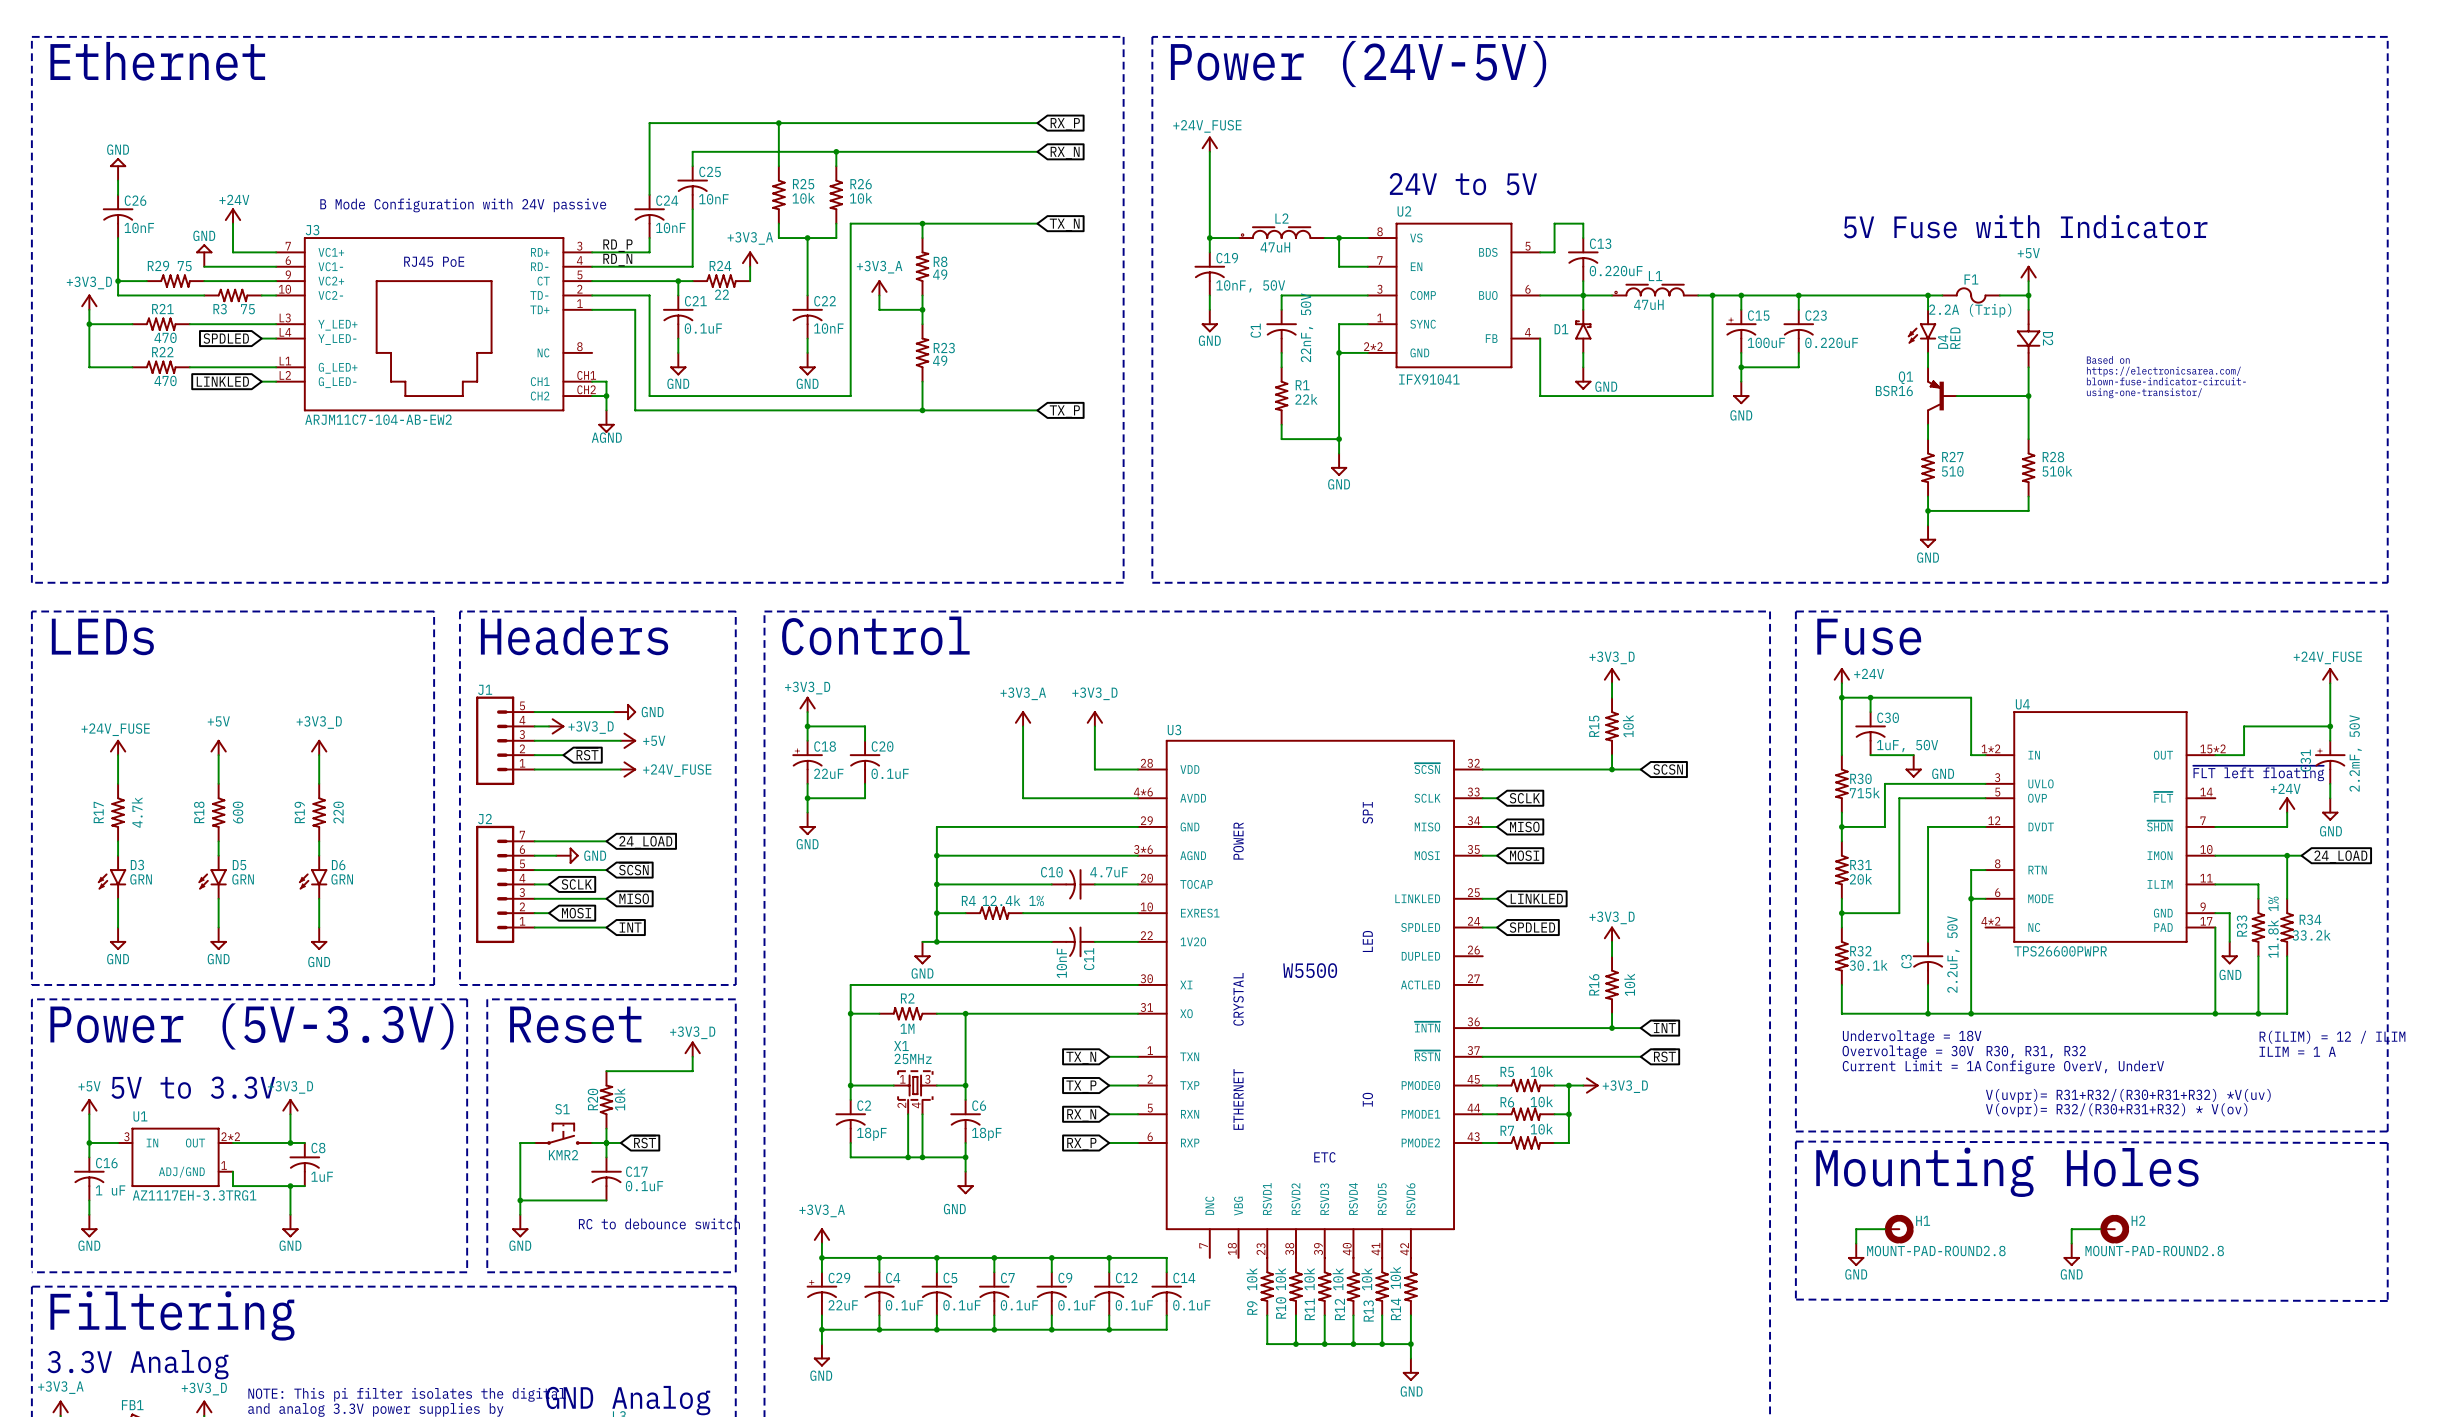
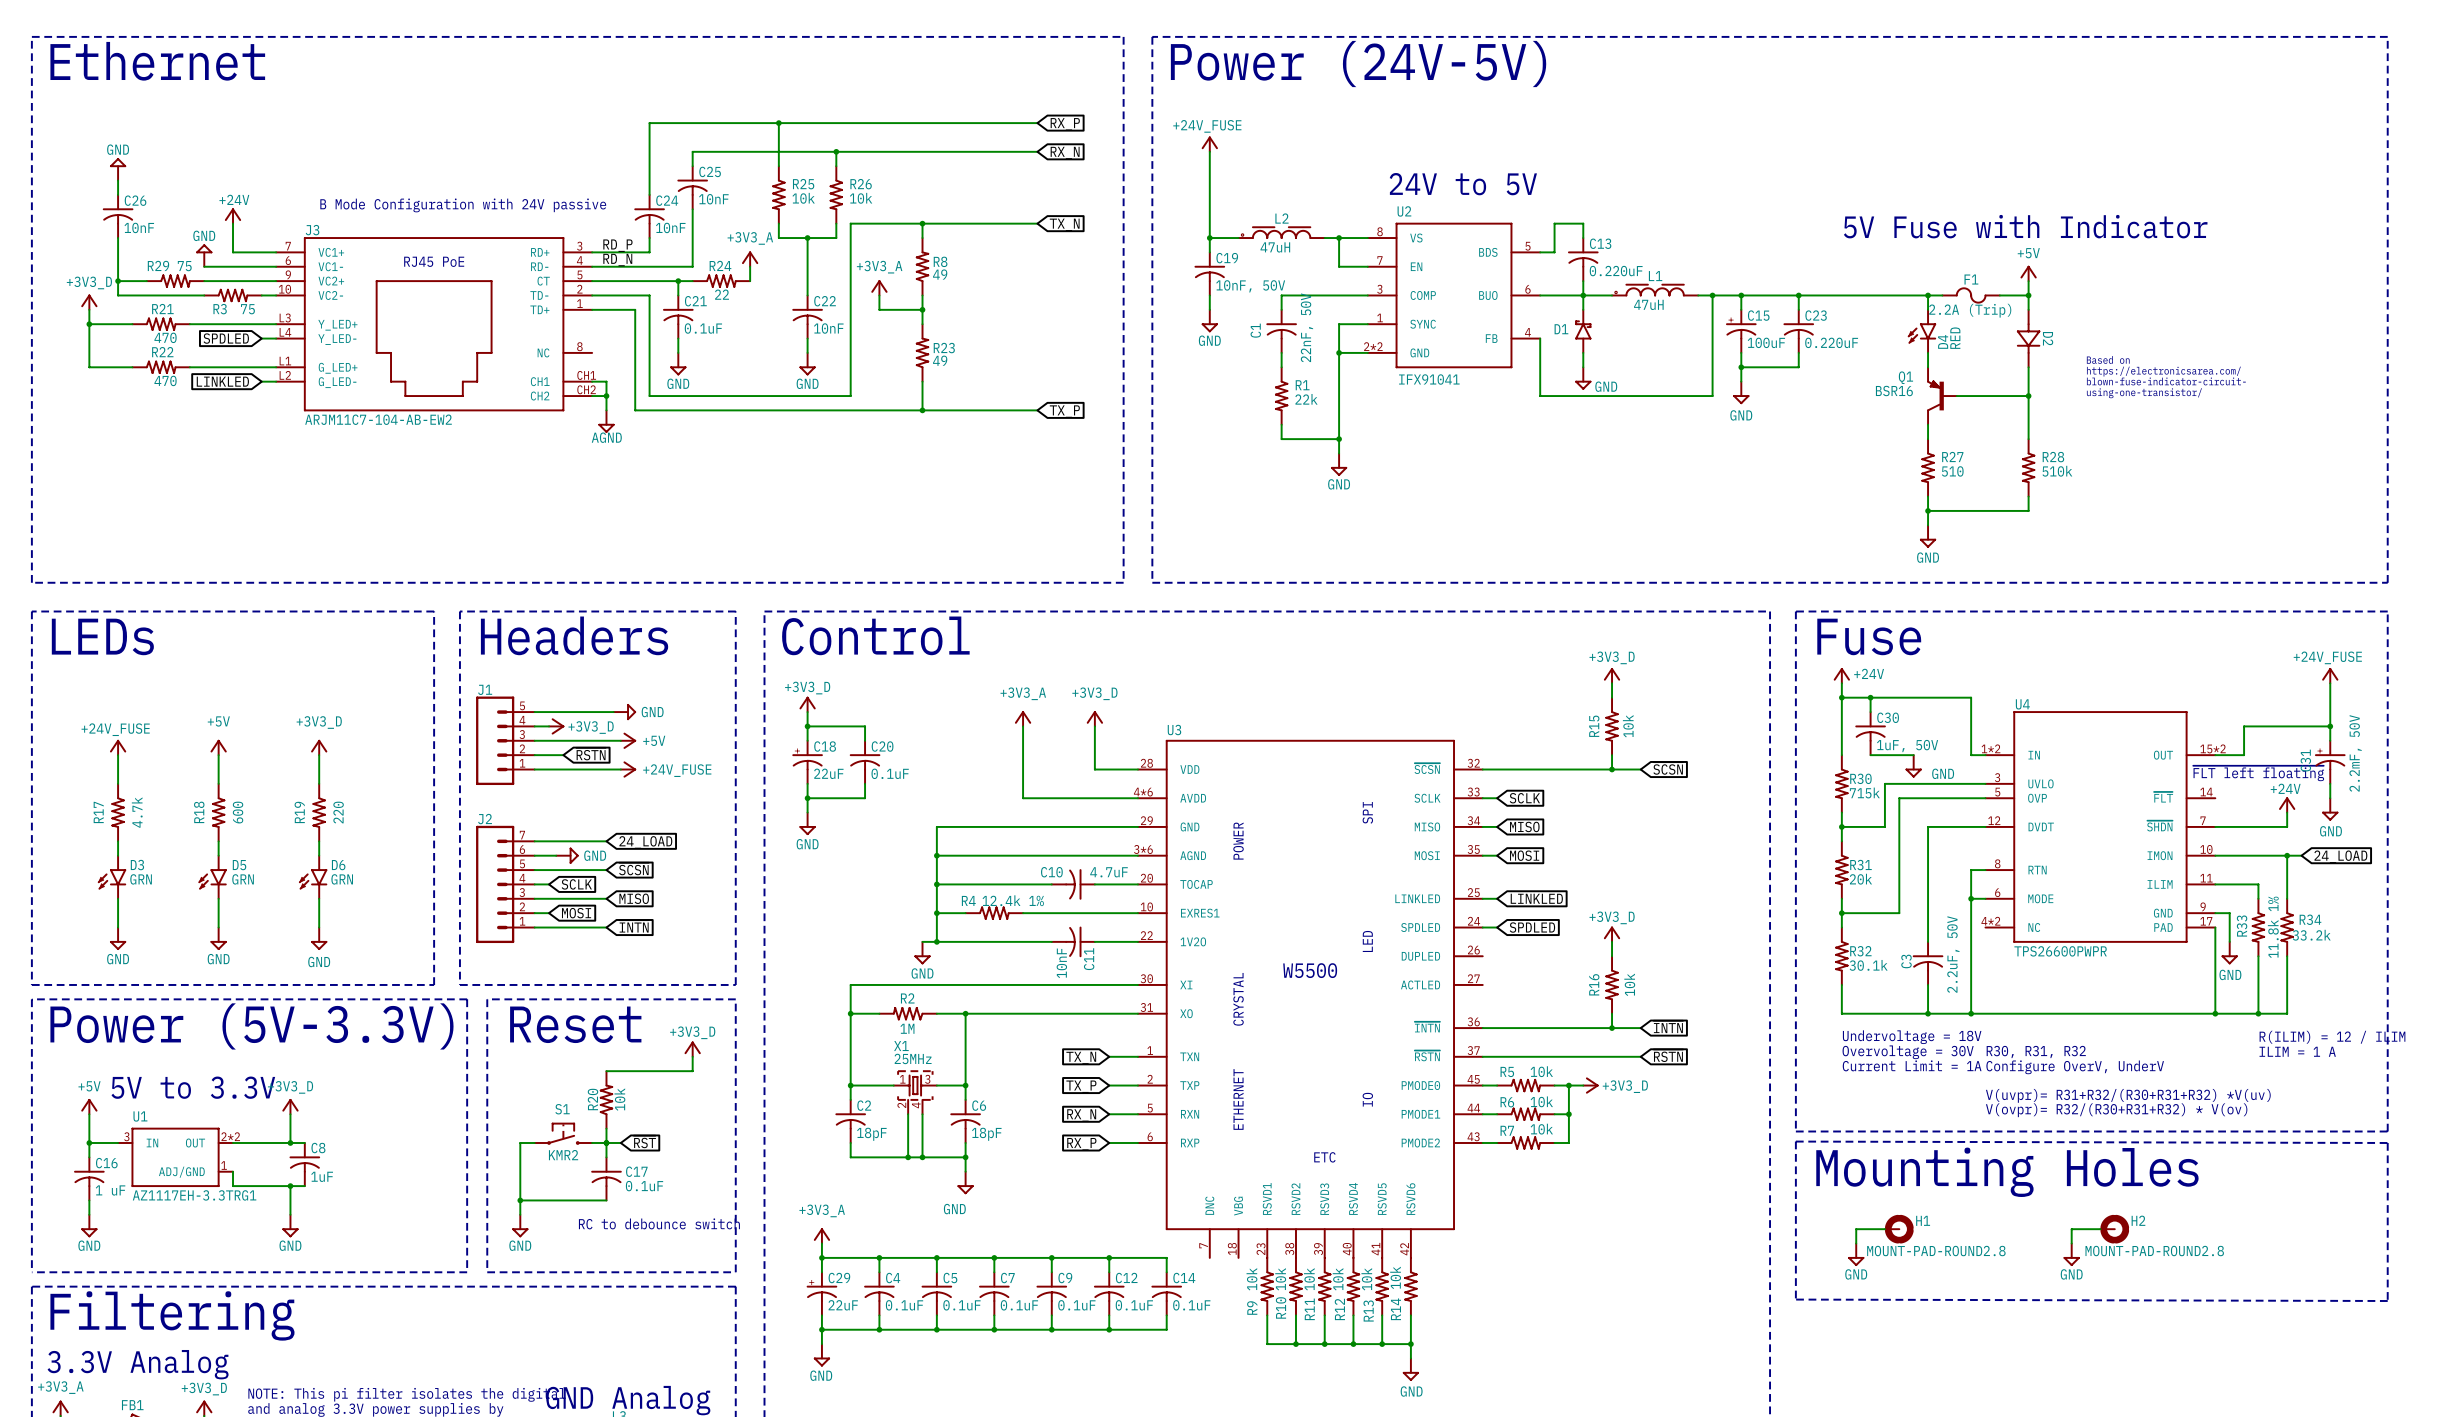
global label: ~{RST} (587, 754) -> ~{RSTN} (591, 754)
global label: ~{INT} (630, 926) -> ~{INTN} (634, 926)
global label: ~{INT} (1664, 1026) -> ~{INTN} (1668, 1026)
global label: ~{RST} (1664, 1055) -> ~{RSTN} (1668, 1055)

